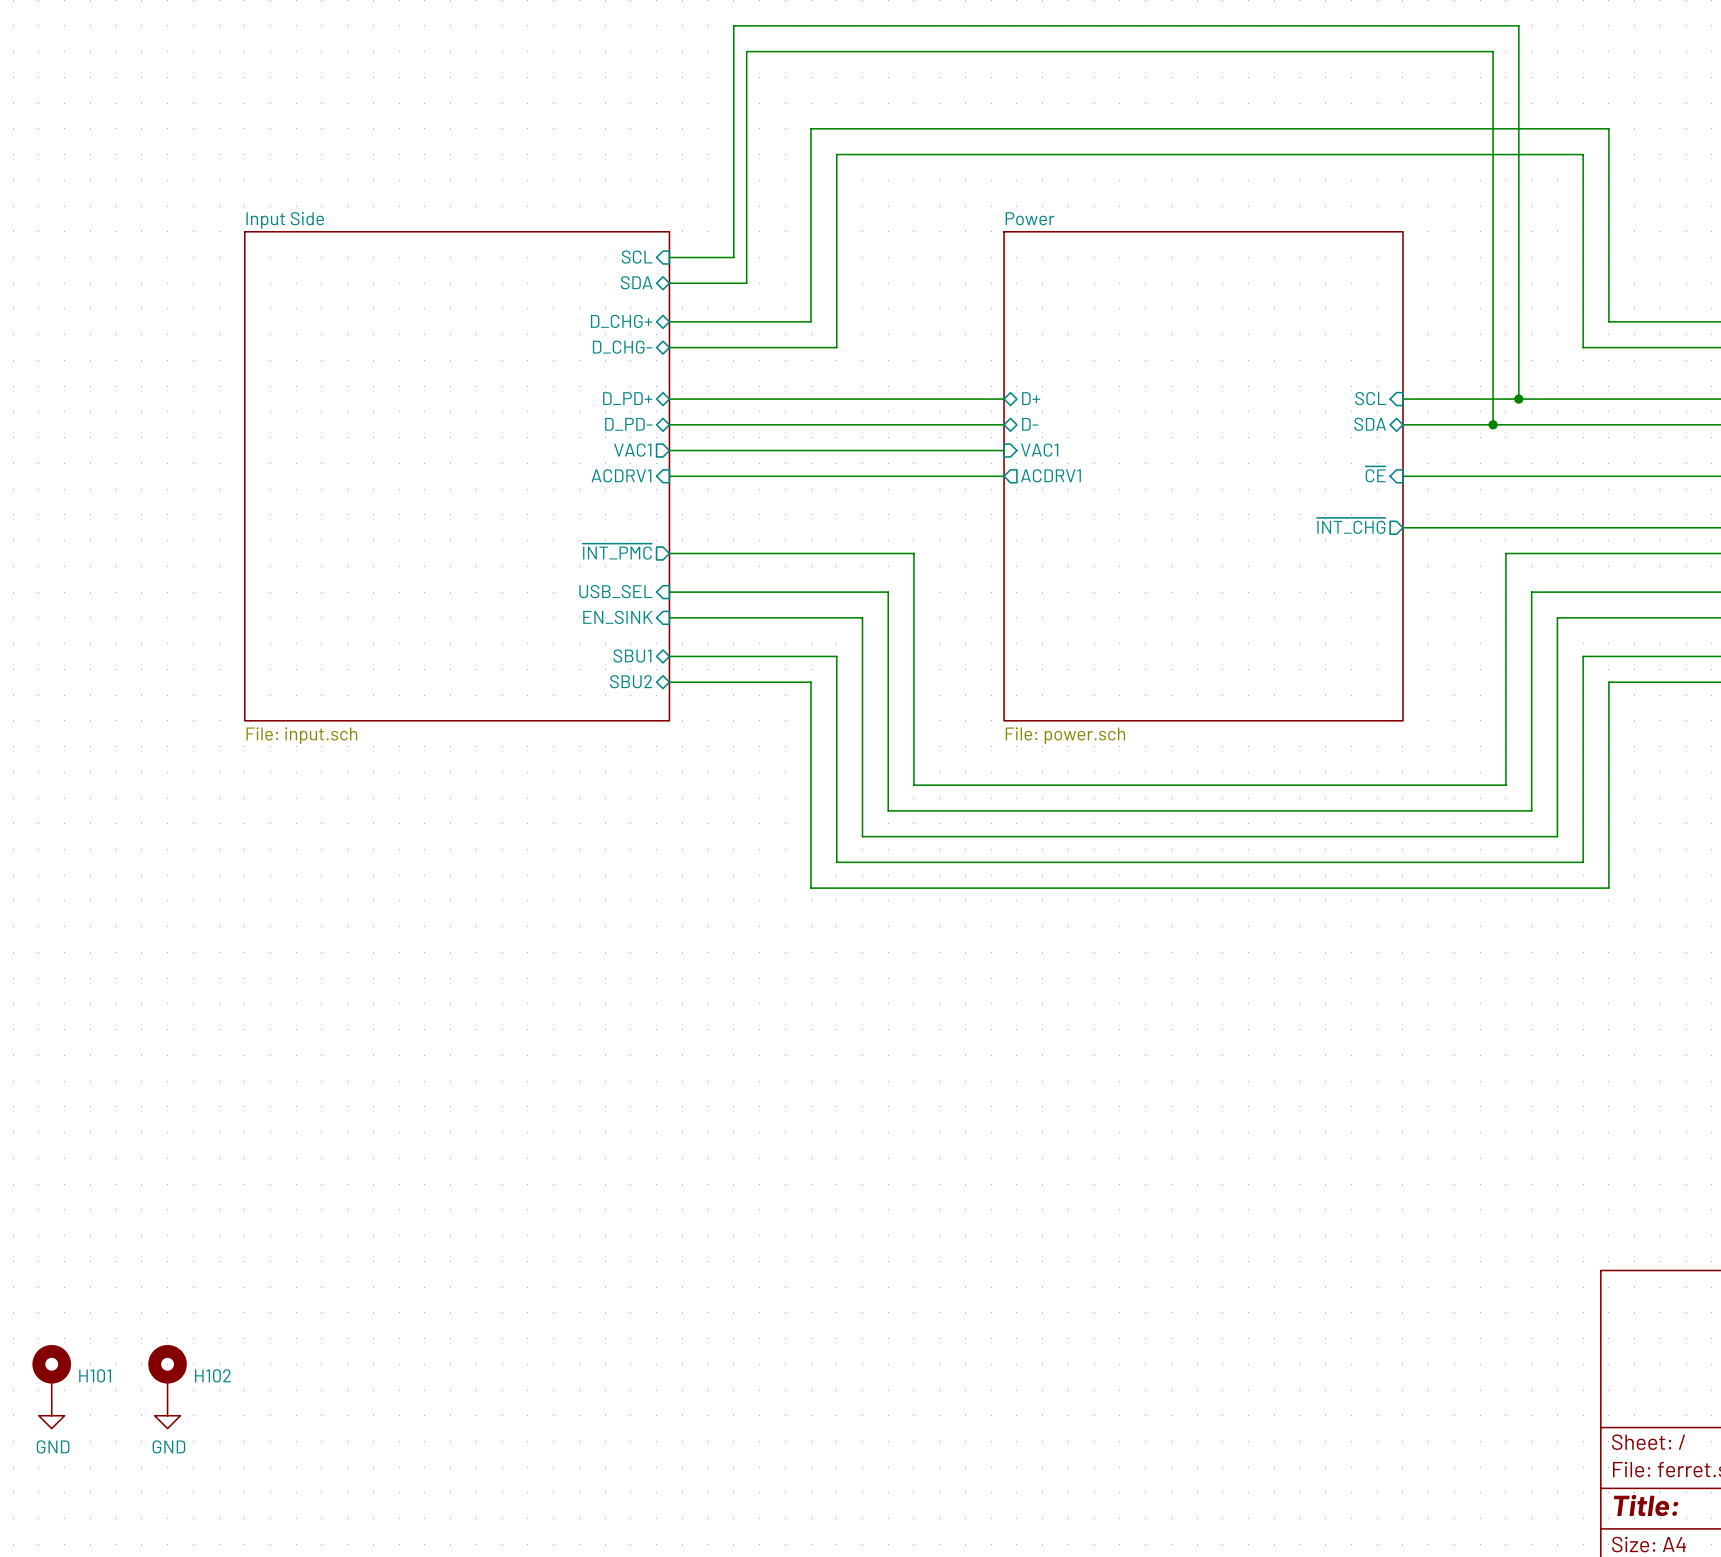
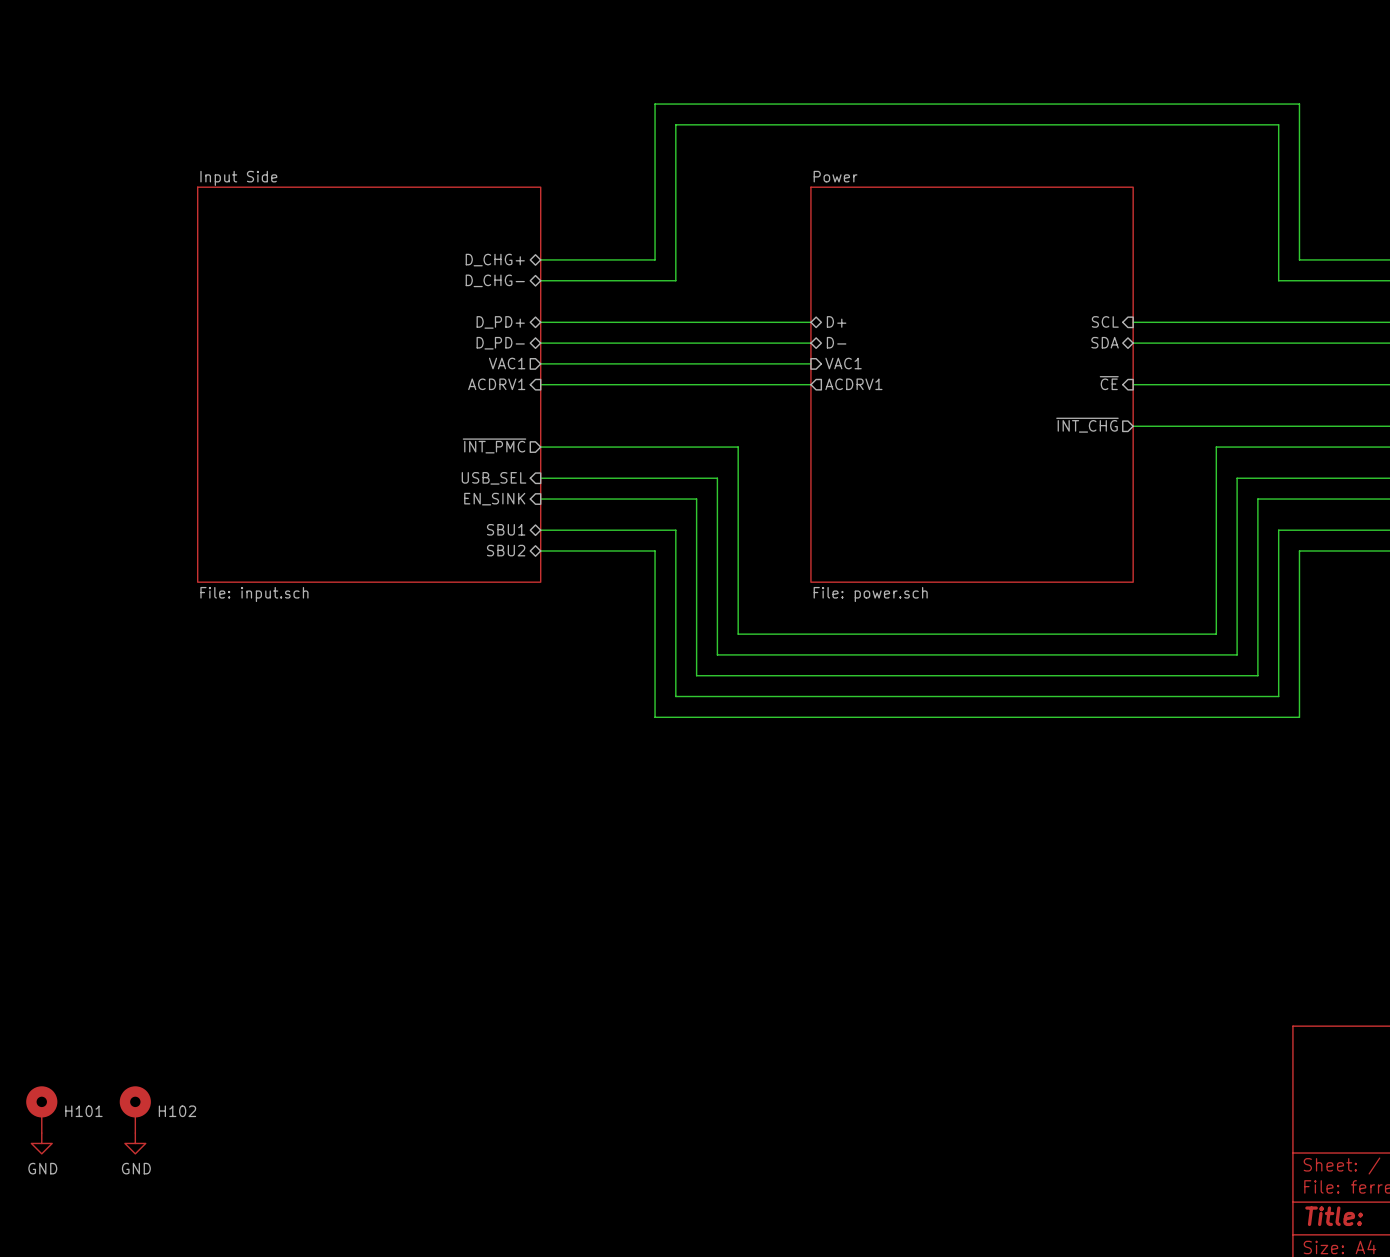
sheet pin: SCL (637, 257) -> none
wire: (669, 257) (733, 257) (733, 25) (1518, 25) (1518, 399) -> none
sheet pin: SDA (636, 282) -> none
wire: (669, 283) (746, 283) (746, 51) (1493, 51) (1493, 424) -> none
junction: (1518, 399) -> none
junction: (1493, 424) -> none

